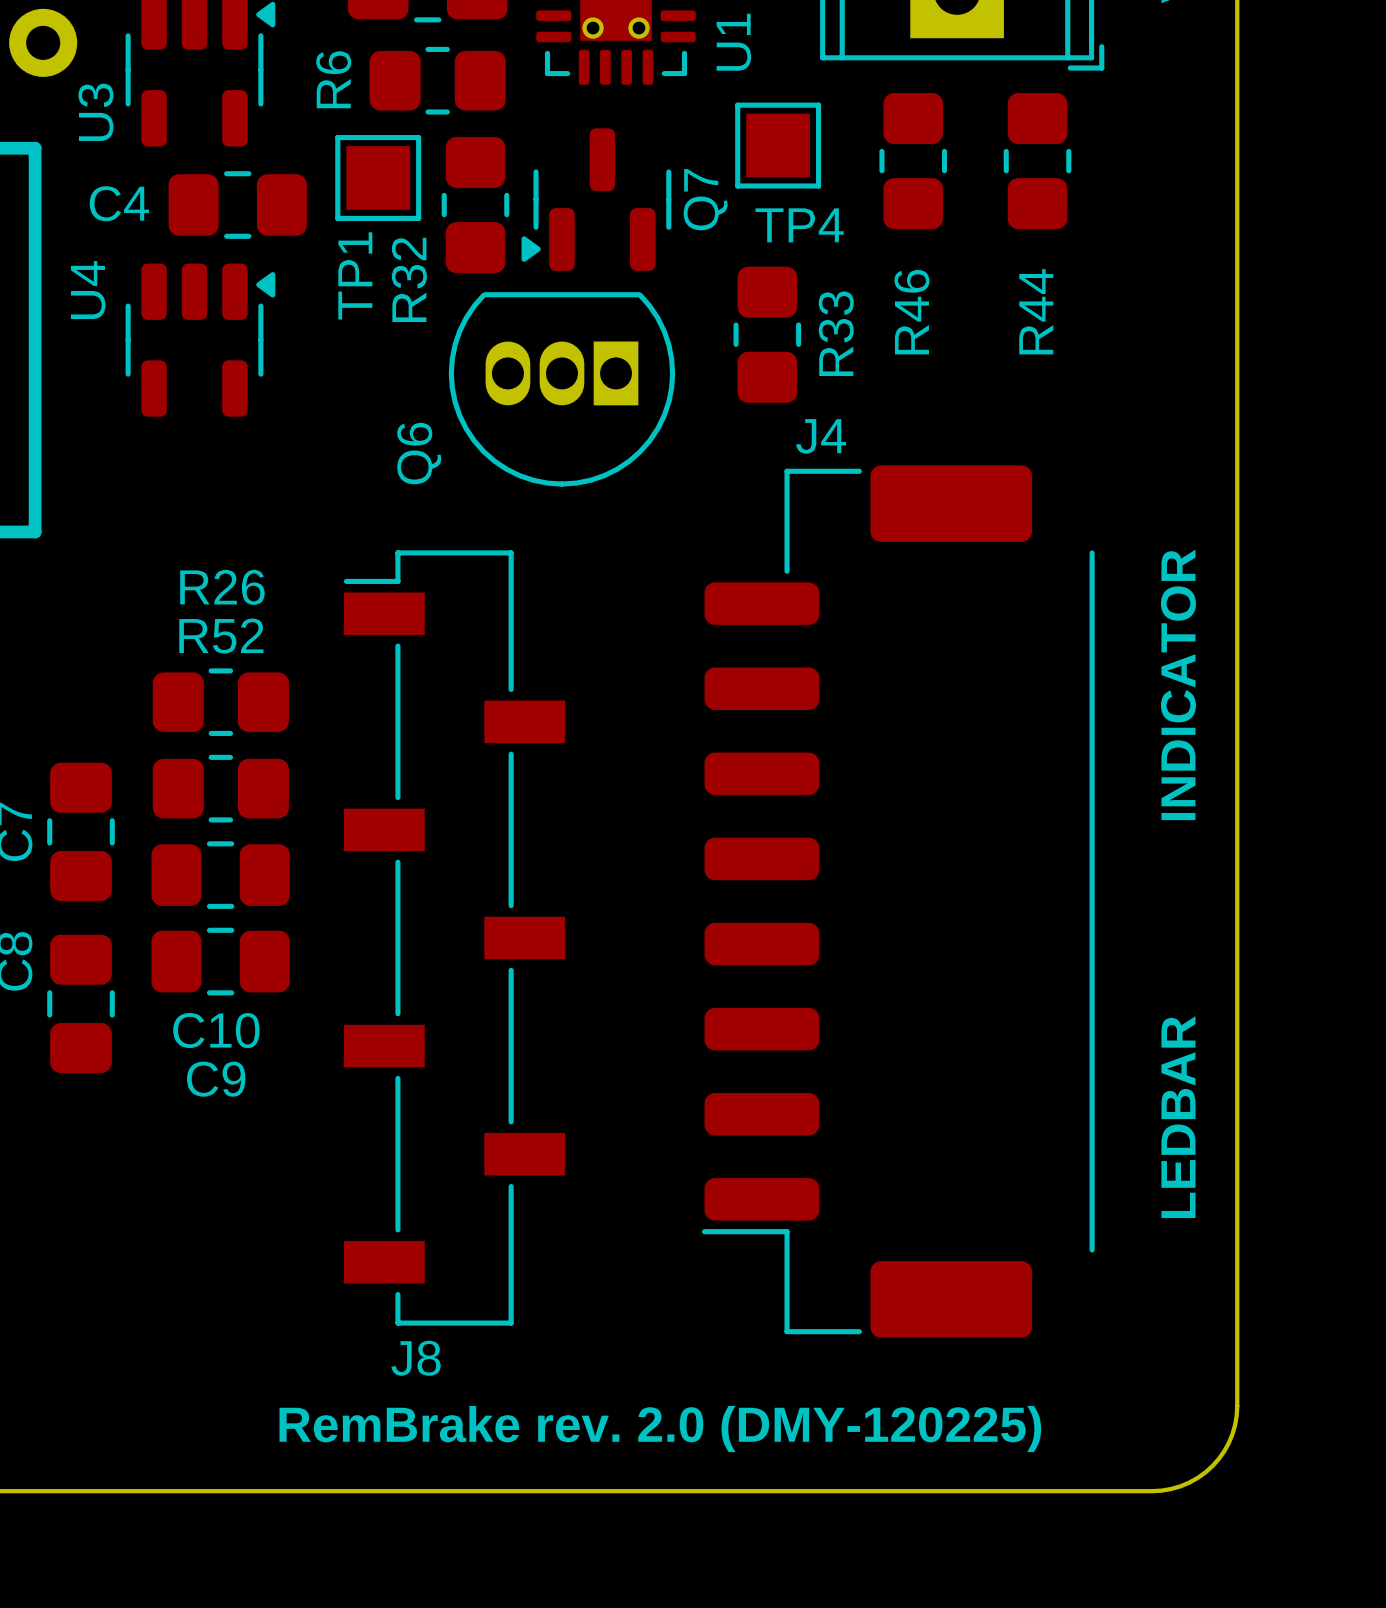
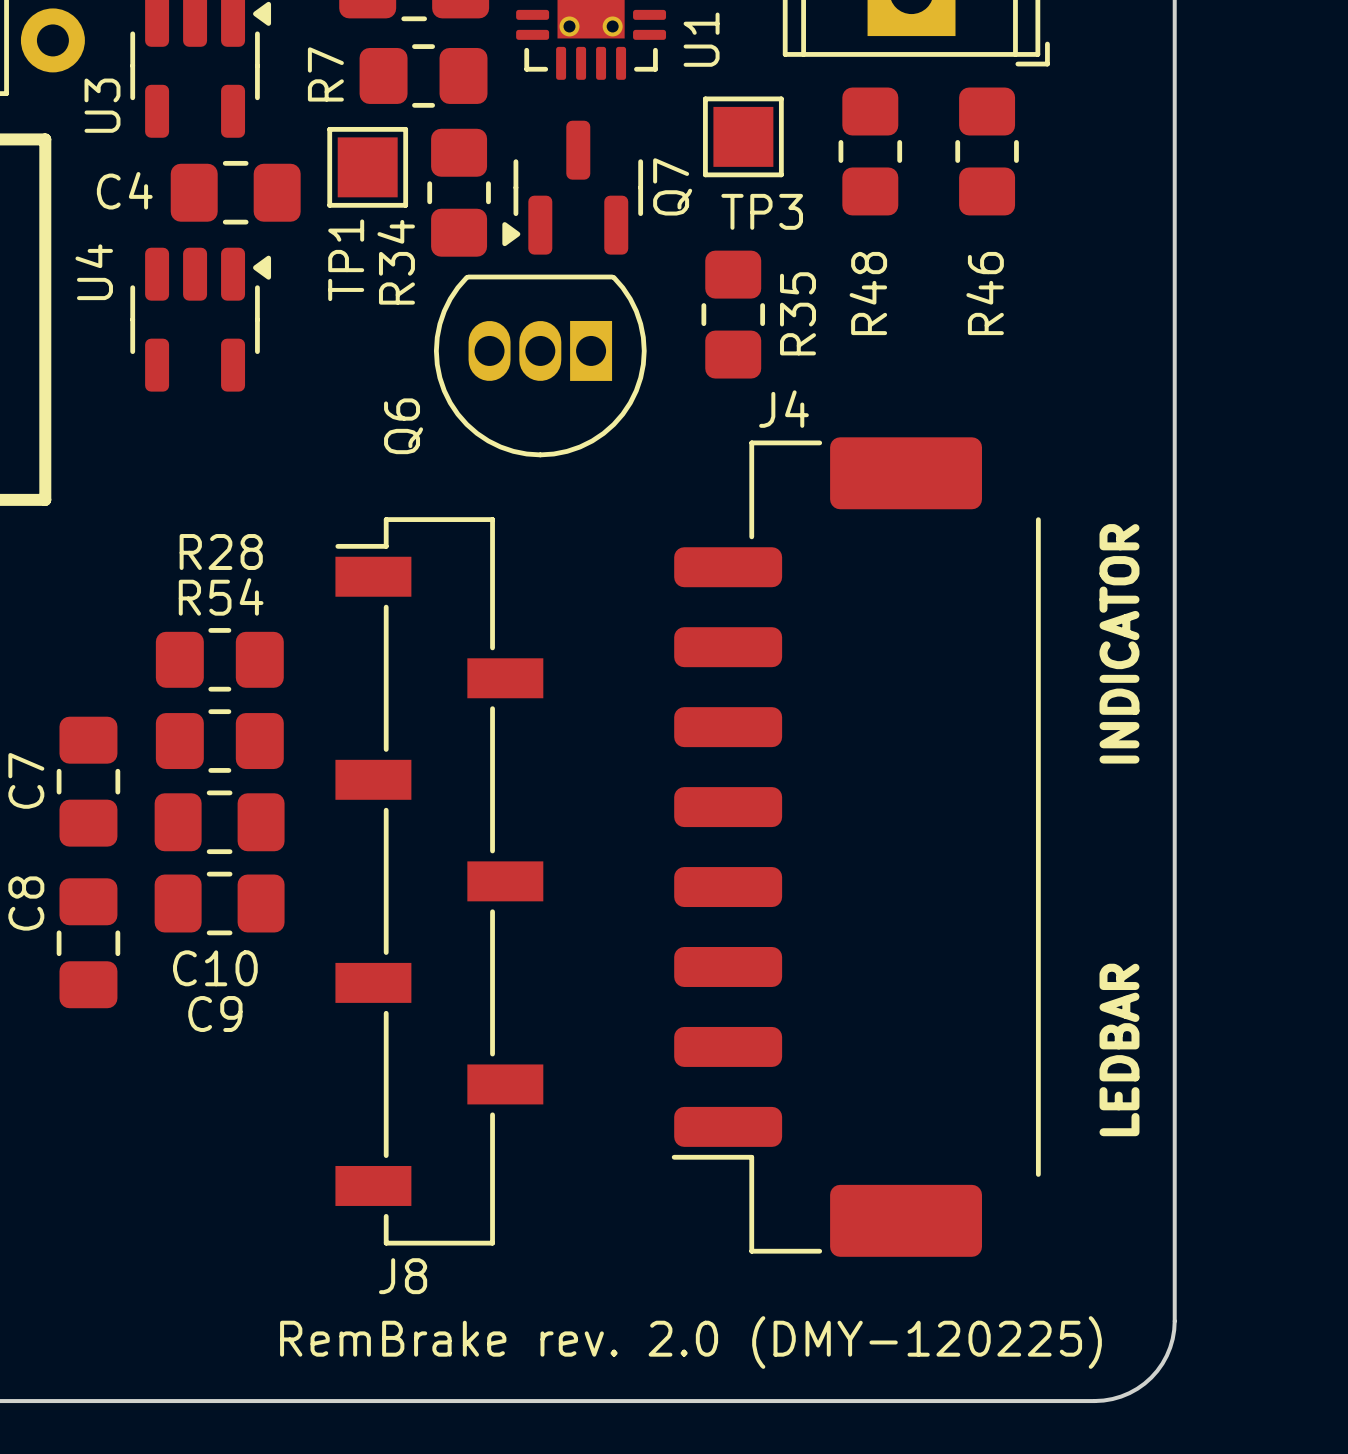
R6 name: R6 (333, 79) -> R7 (325, 74)
TP4 name: TP4 (799, 225) -> TP3 (762, 211)
R32 name: R32 (409, 279) -> R34 (396, 262)
R44 name: R44 (1036, 311) -> R46 (985, 293)
R46 name: R46 (911, 312) -> R48 (868, 293)
R33 name: R33 (836, 333) -> R35 (798, 313)
R26 name: R26 (222, 587) -> R28 (221, 552)
R52 name: R52 (221, 636) -> R54 (221, 596)

